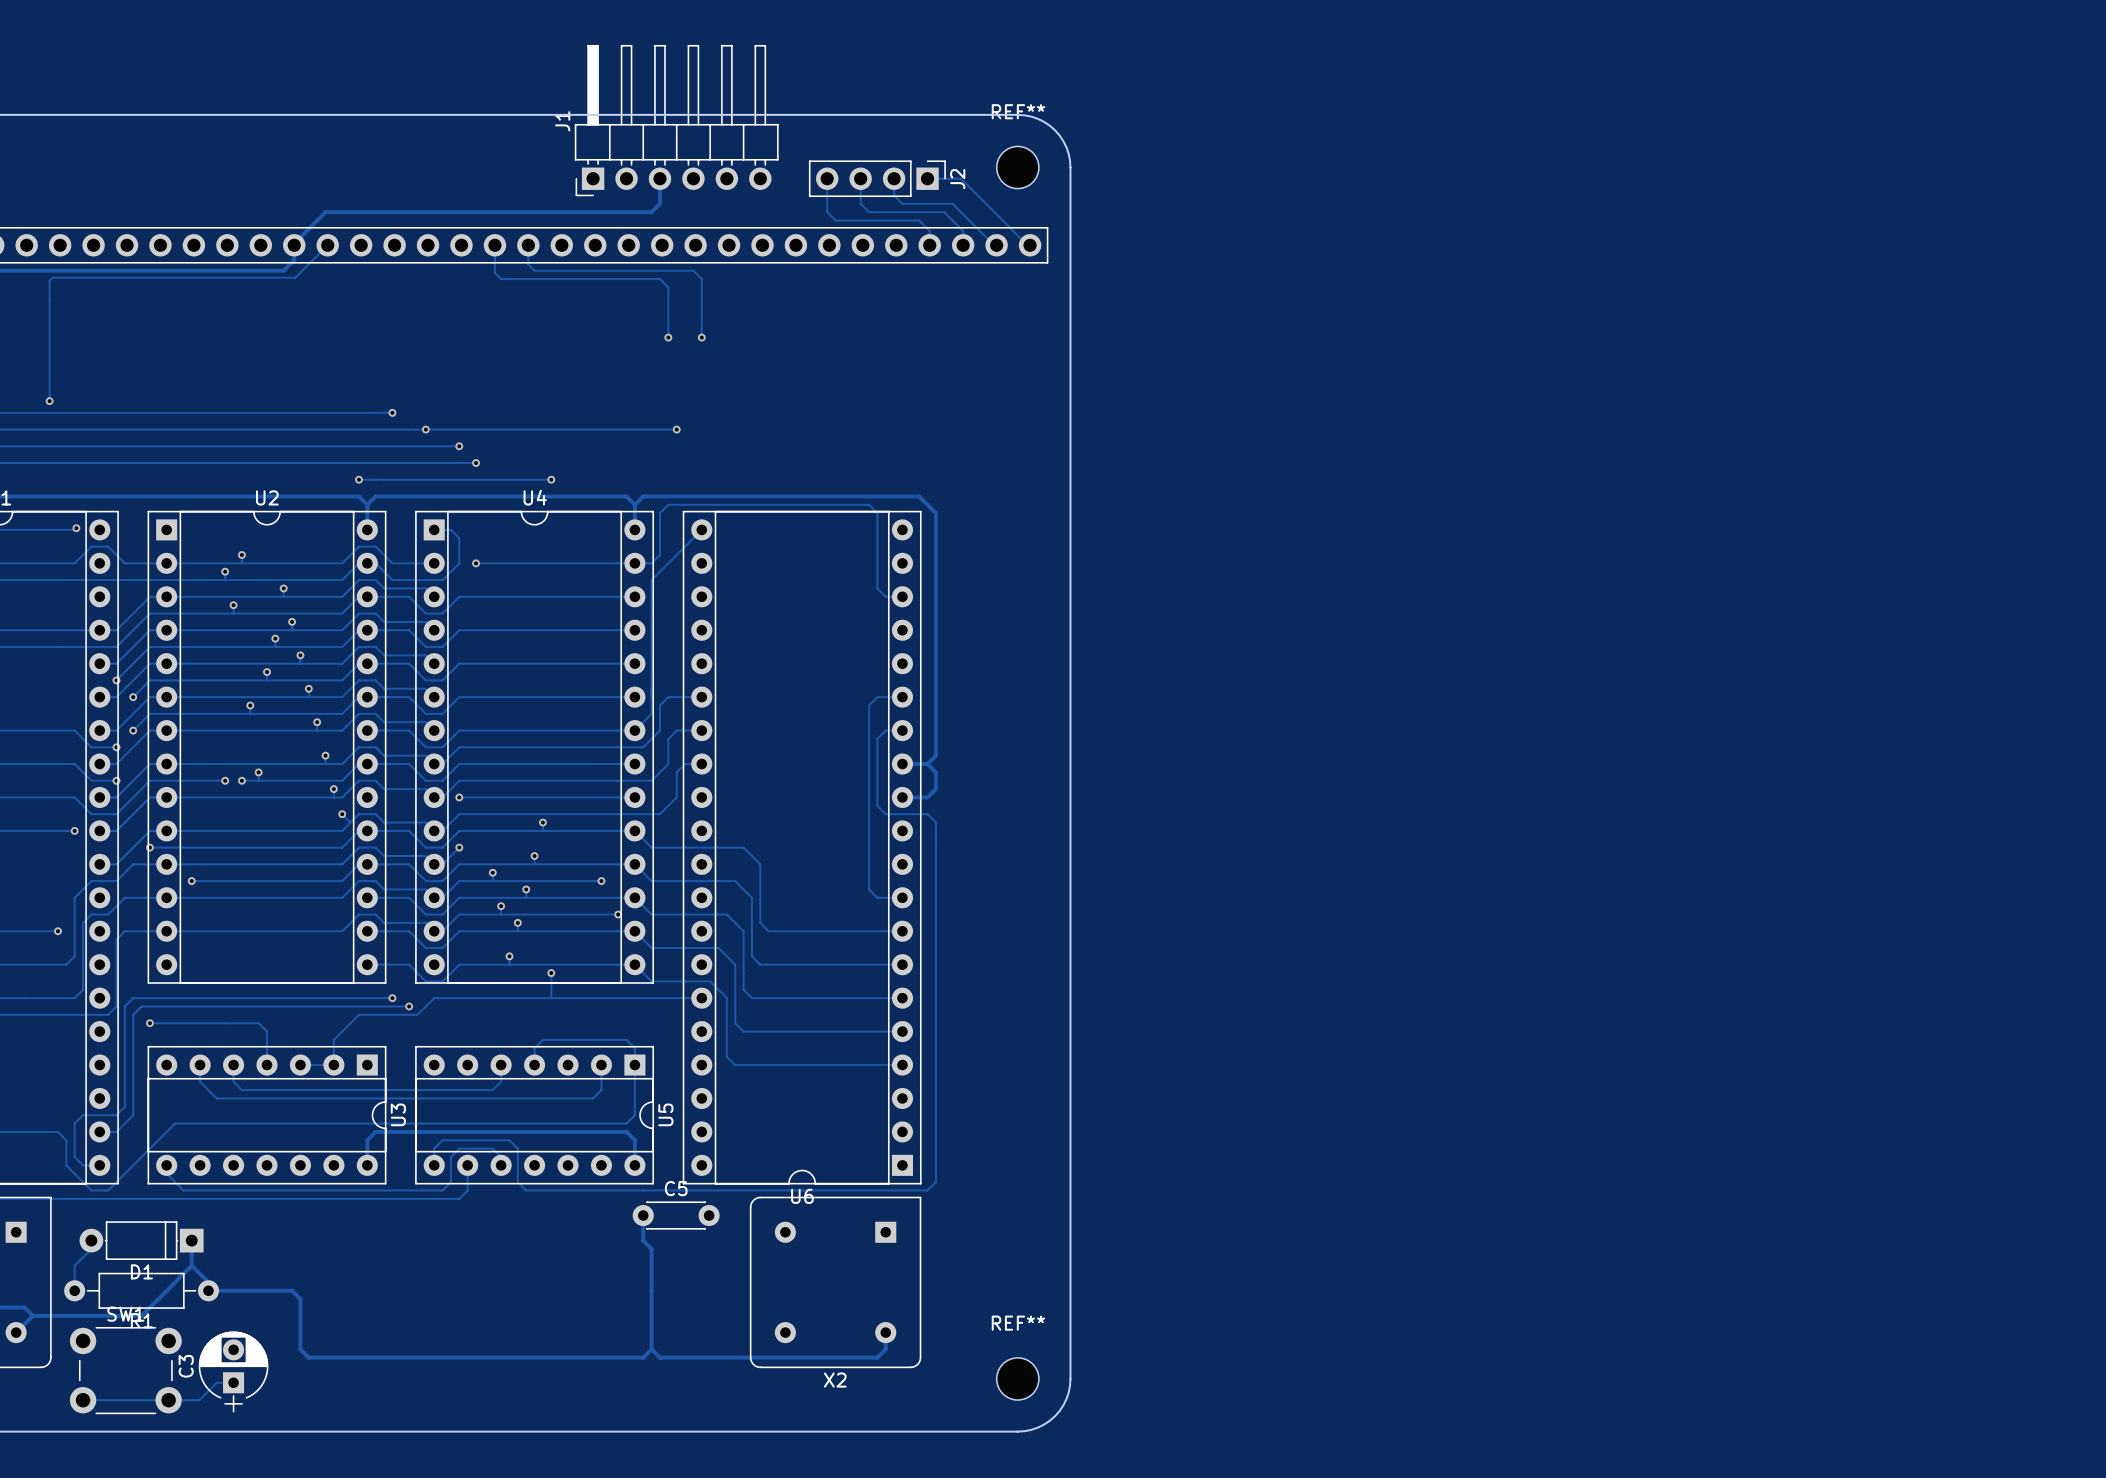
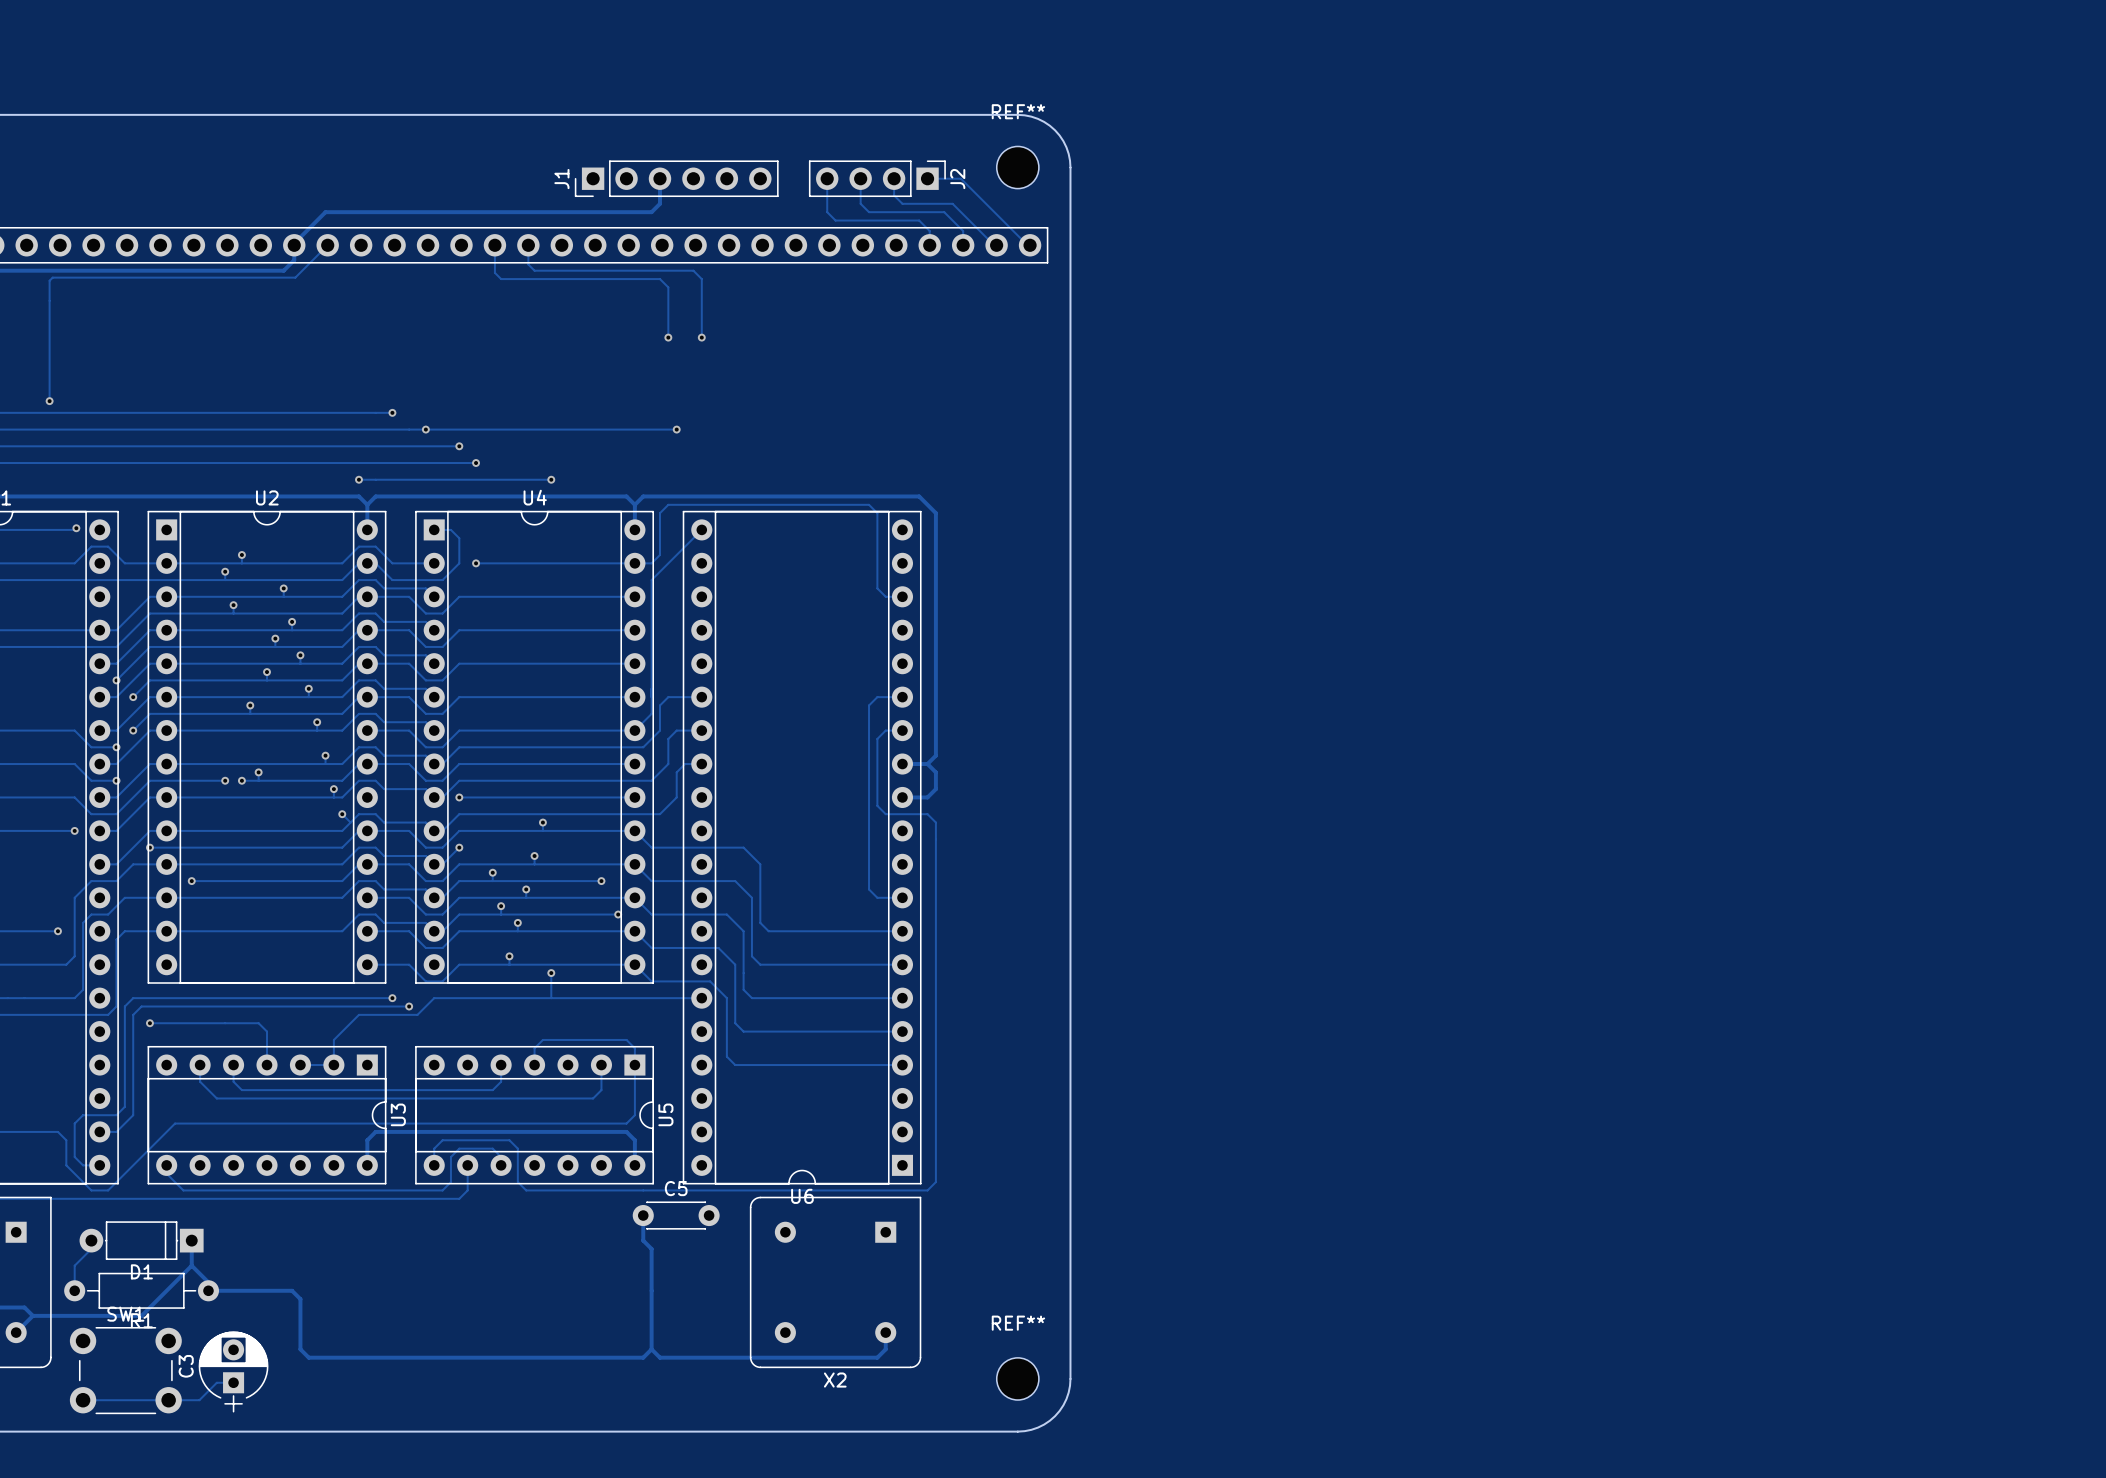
J1 footprint: [574, 44, 779, 197] -> [574, 160, 779, 198]

